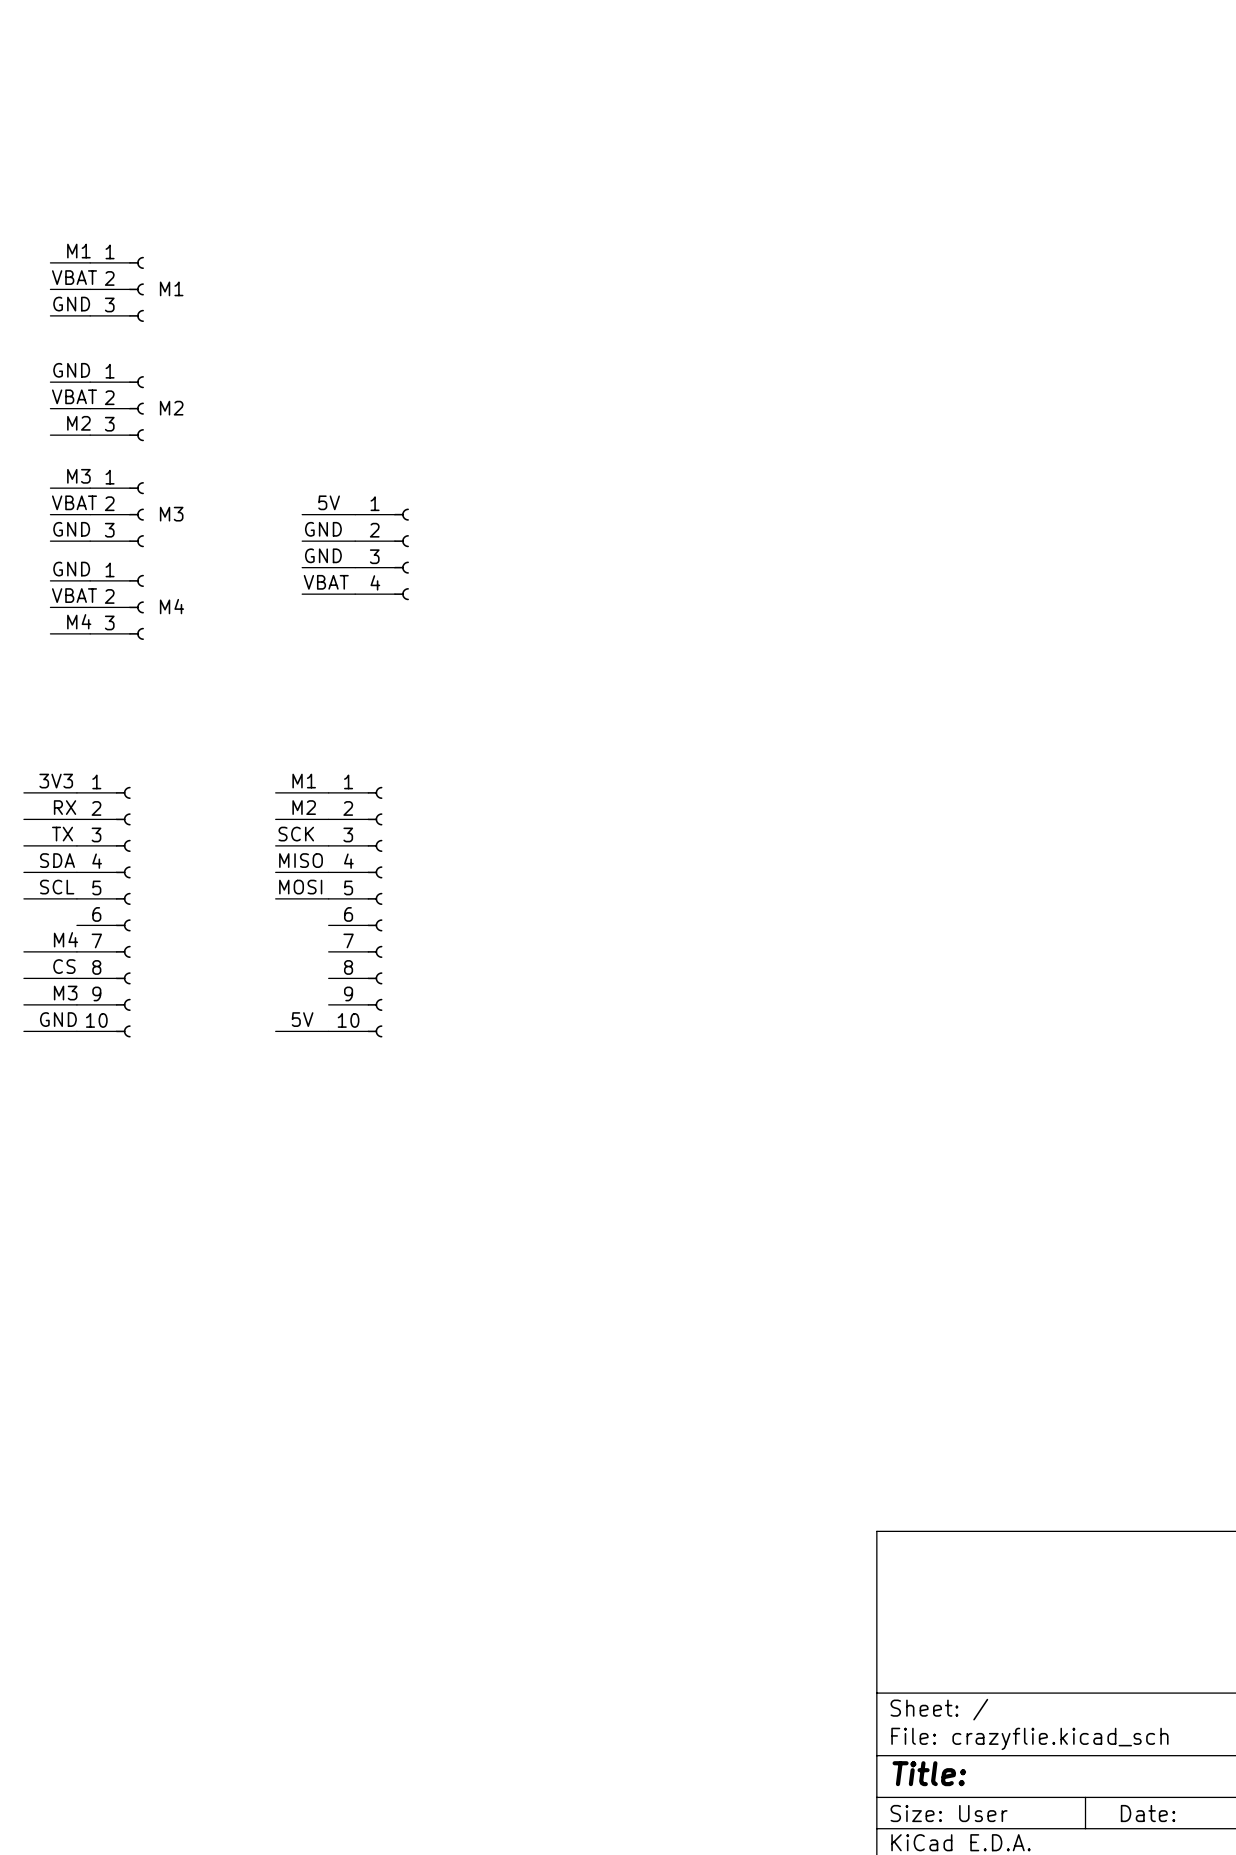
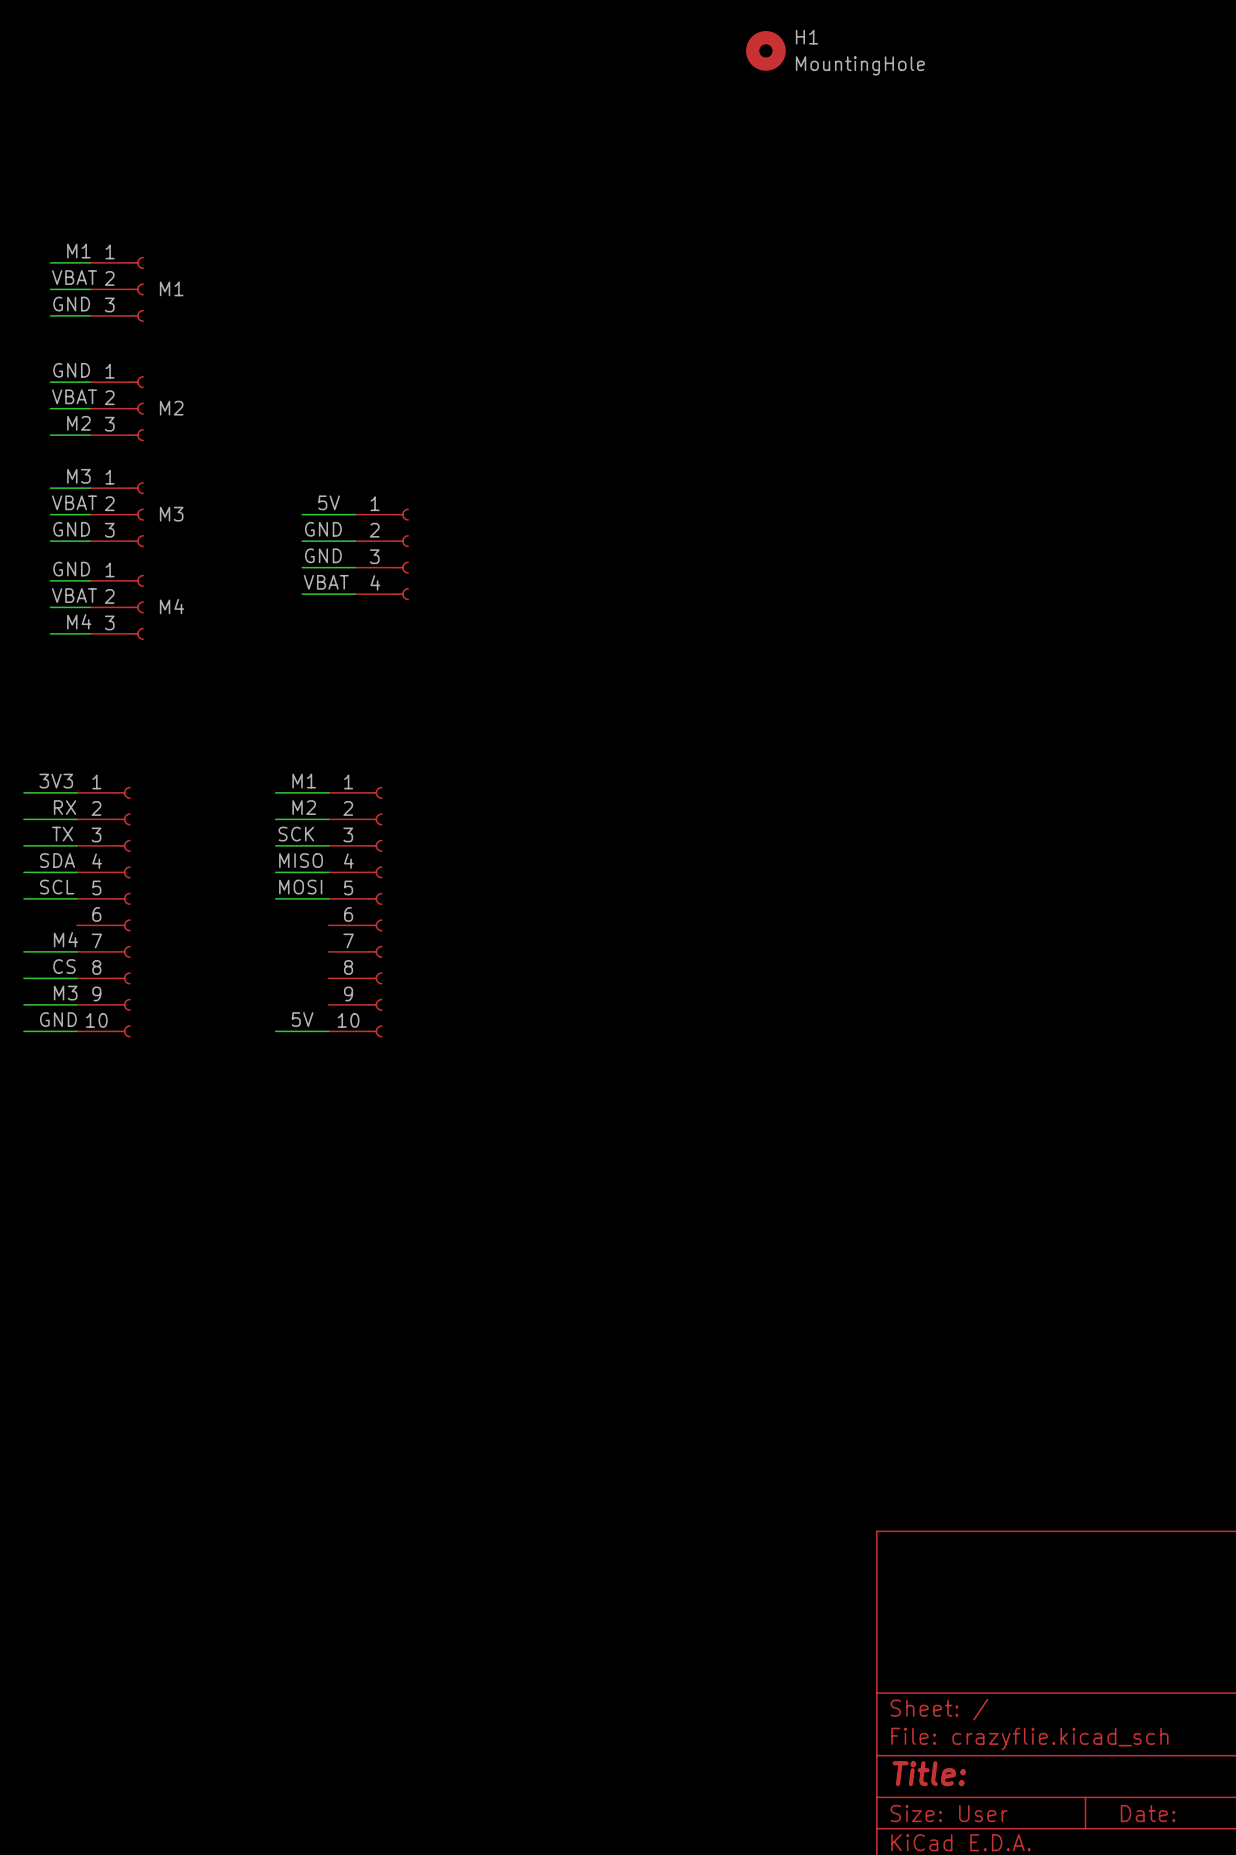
H1: none -> MountingHole (765, 50)

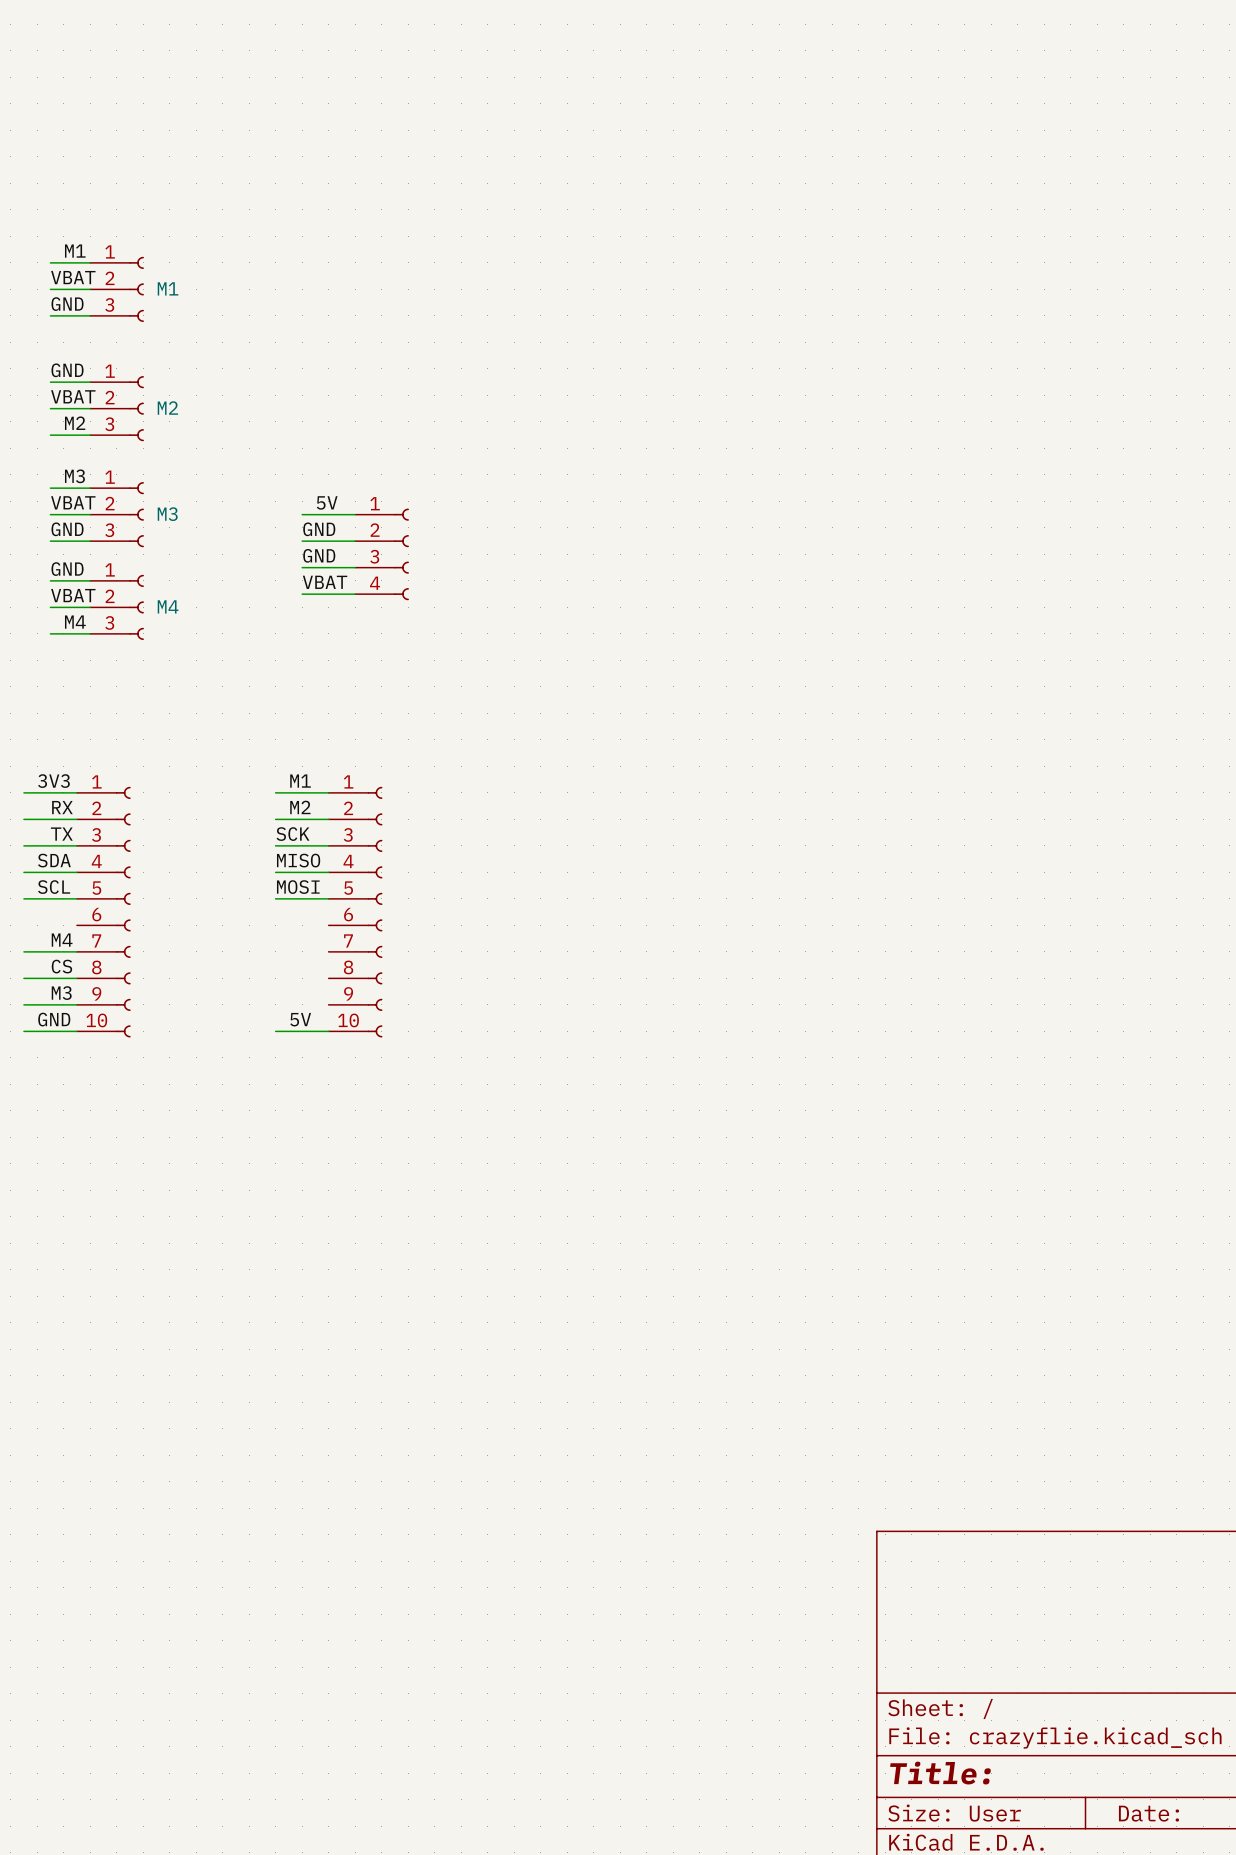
H1: MountingHole (765, 50) -> none

